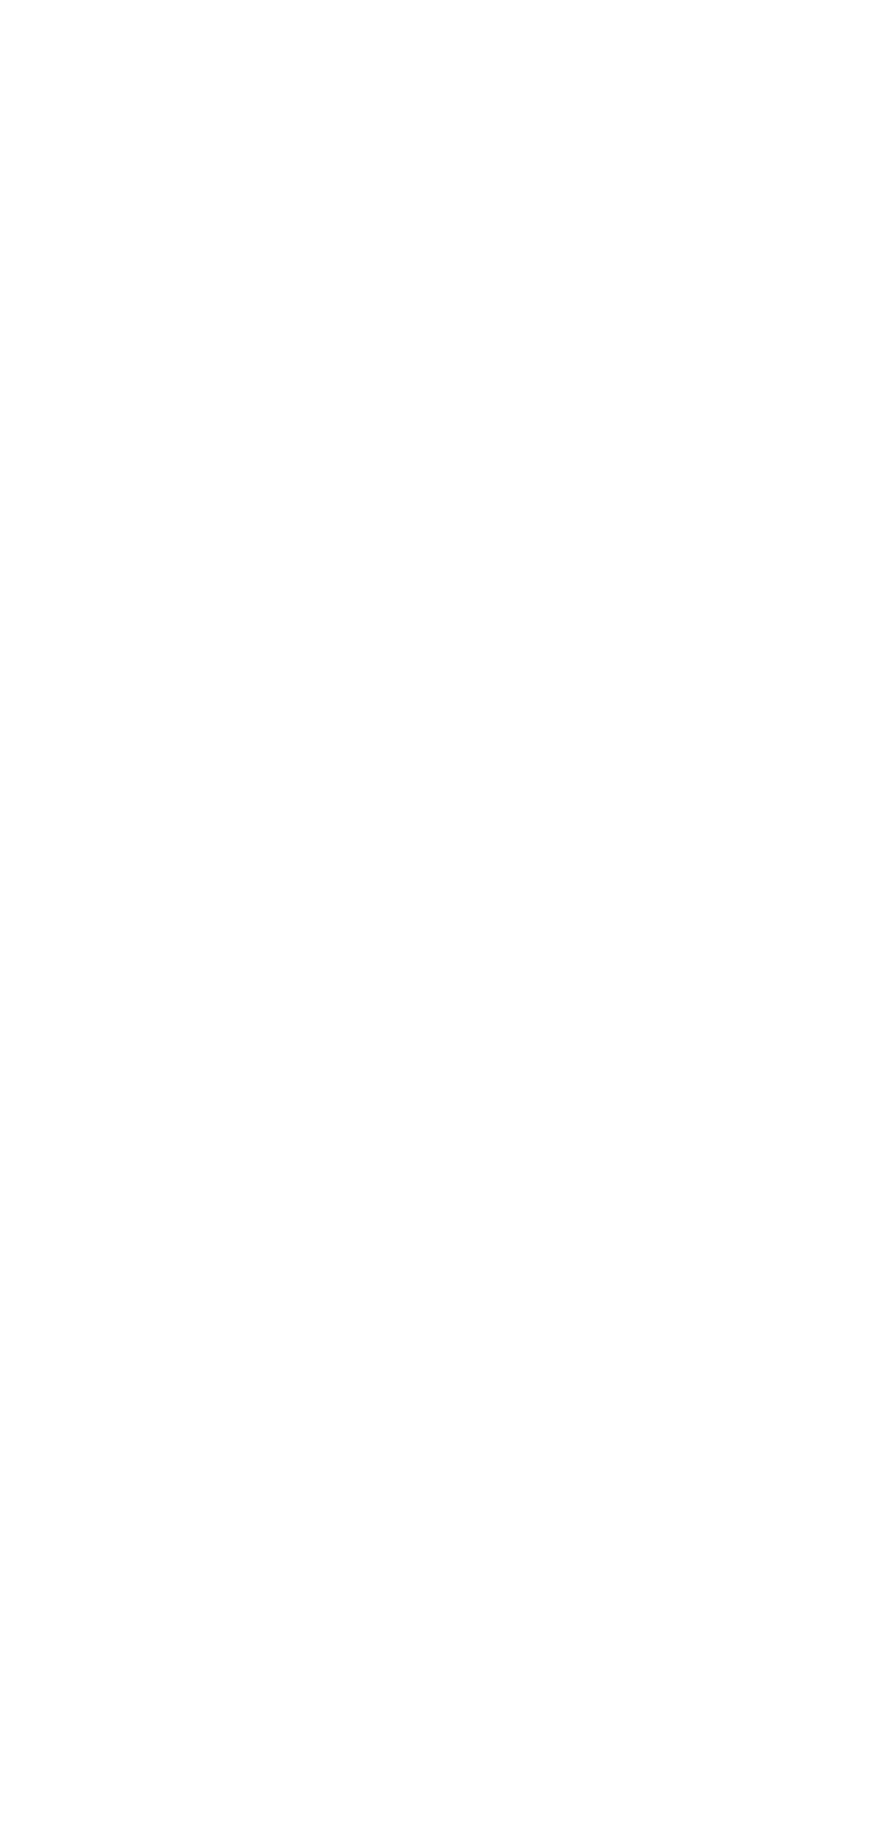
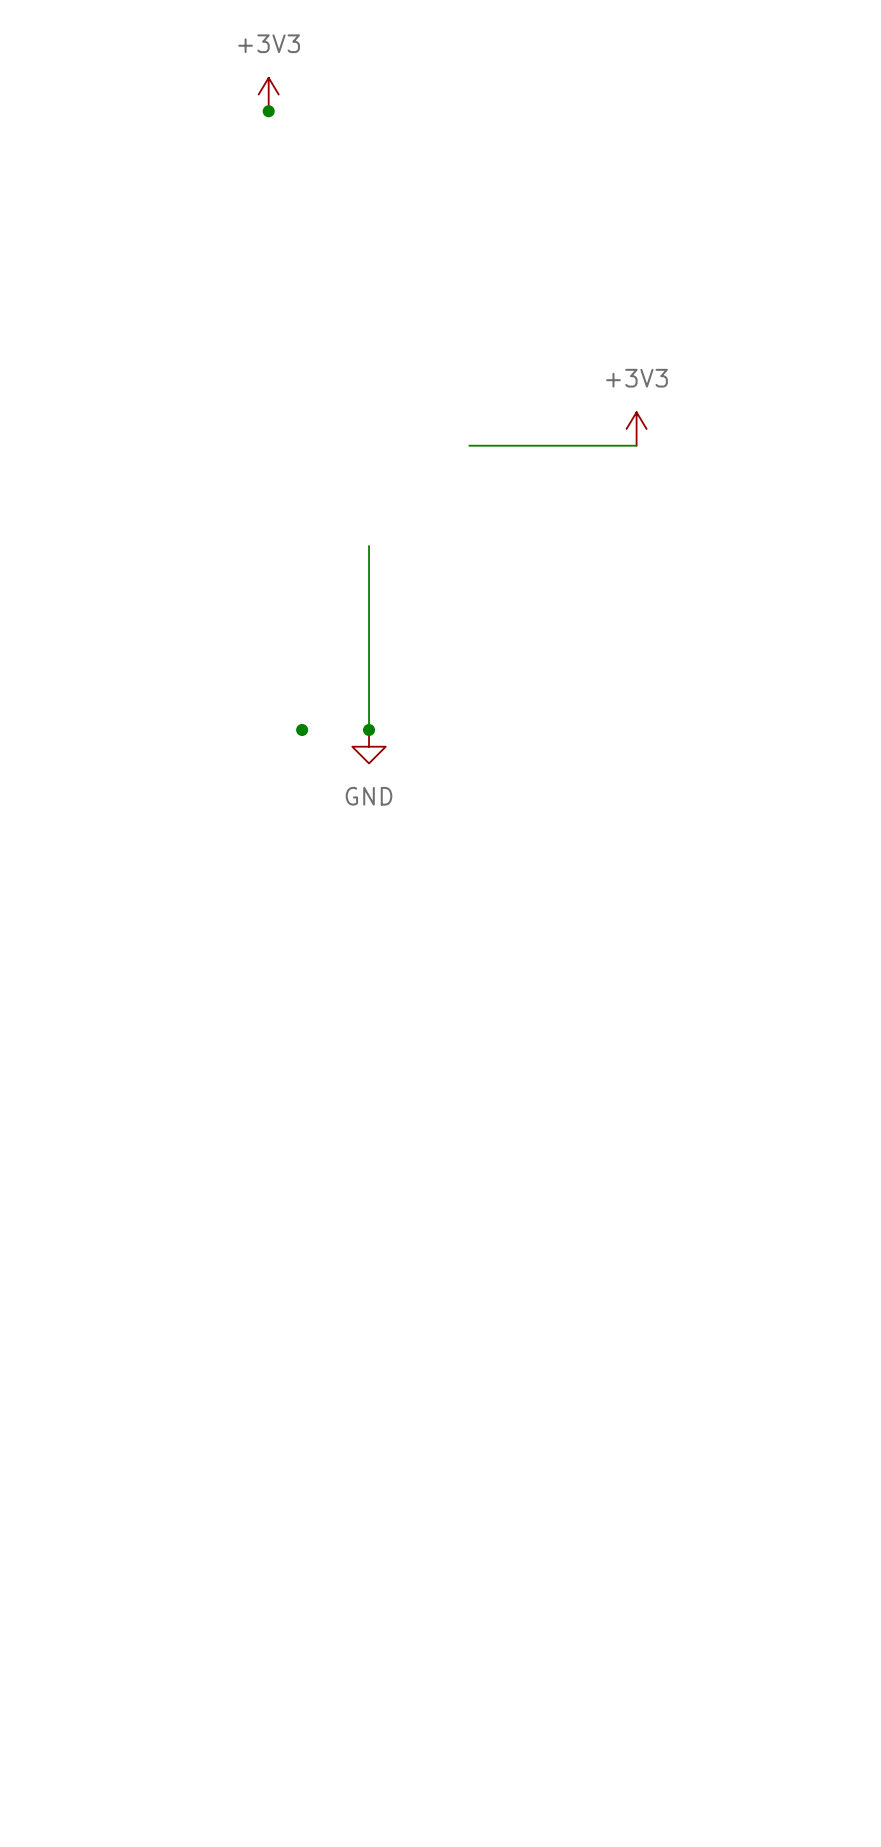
power symbol: none -> +3V3 (268, 94)
junction: none -> (268, 111)
power symbol: none -> +3V3 (636, 428)
wire: none -> (469, 445) (636, 445)
wire: none -> (369, 546) (369, 729)
junction: none -> (302, 729)
junction: none -> (369, 729)
power symbol: none -> GND (369, 746)

